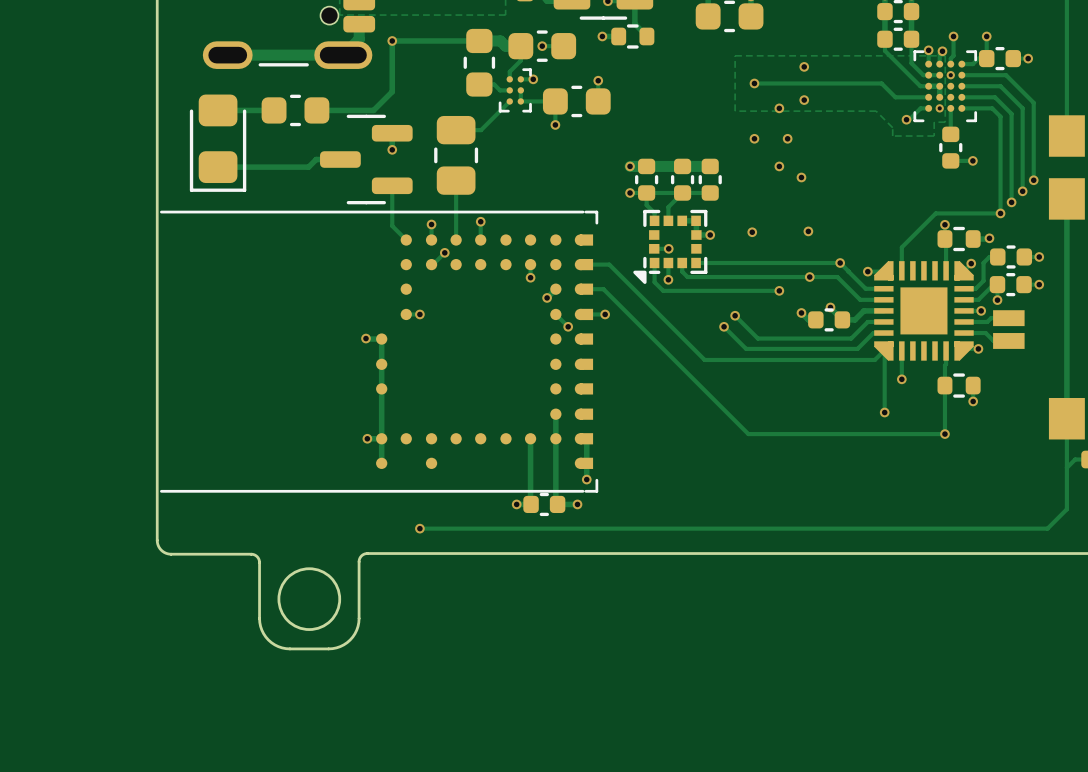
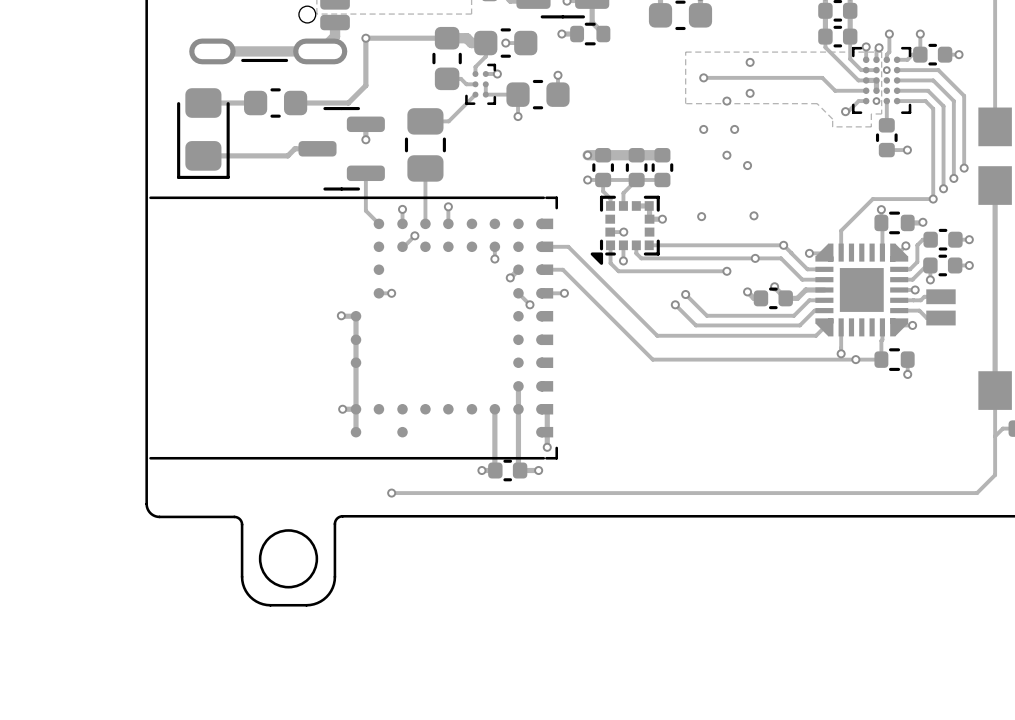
track: (884, 350) (884, 412) -> none
track: (699, 385) (748, 434) (944, 434) (944, 385) -> (652, 359) (881, 359)
via: none -> (855, 359)
via: (884, 412) -> none
via: (944, 434) -> none

